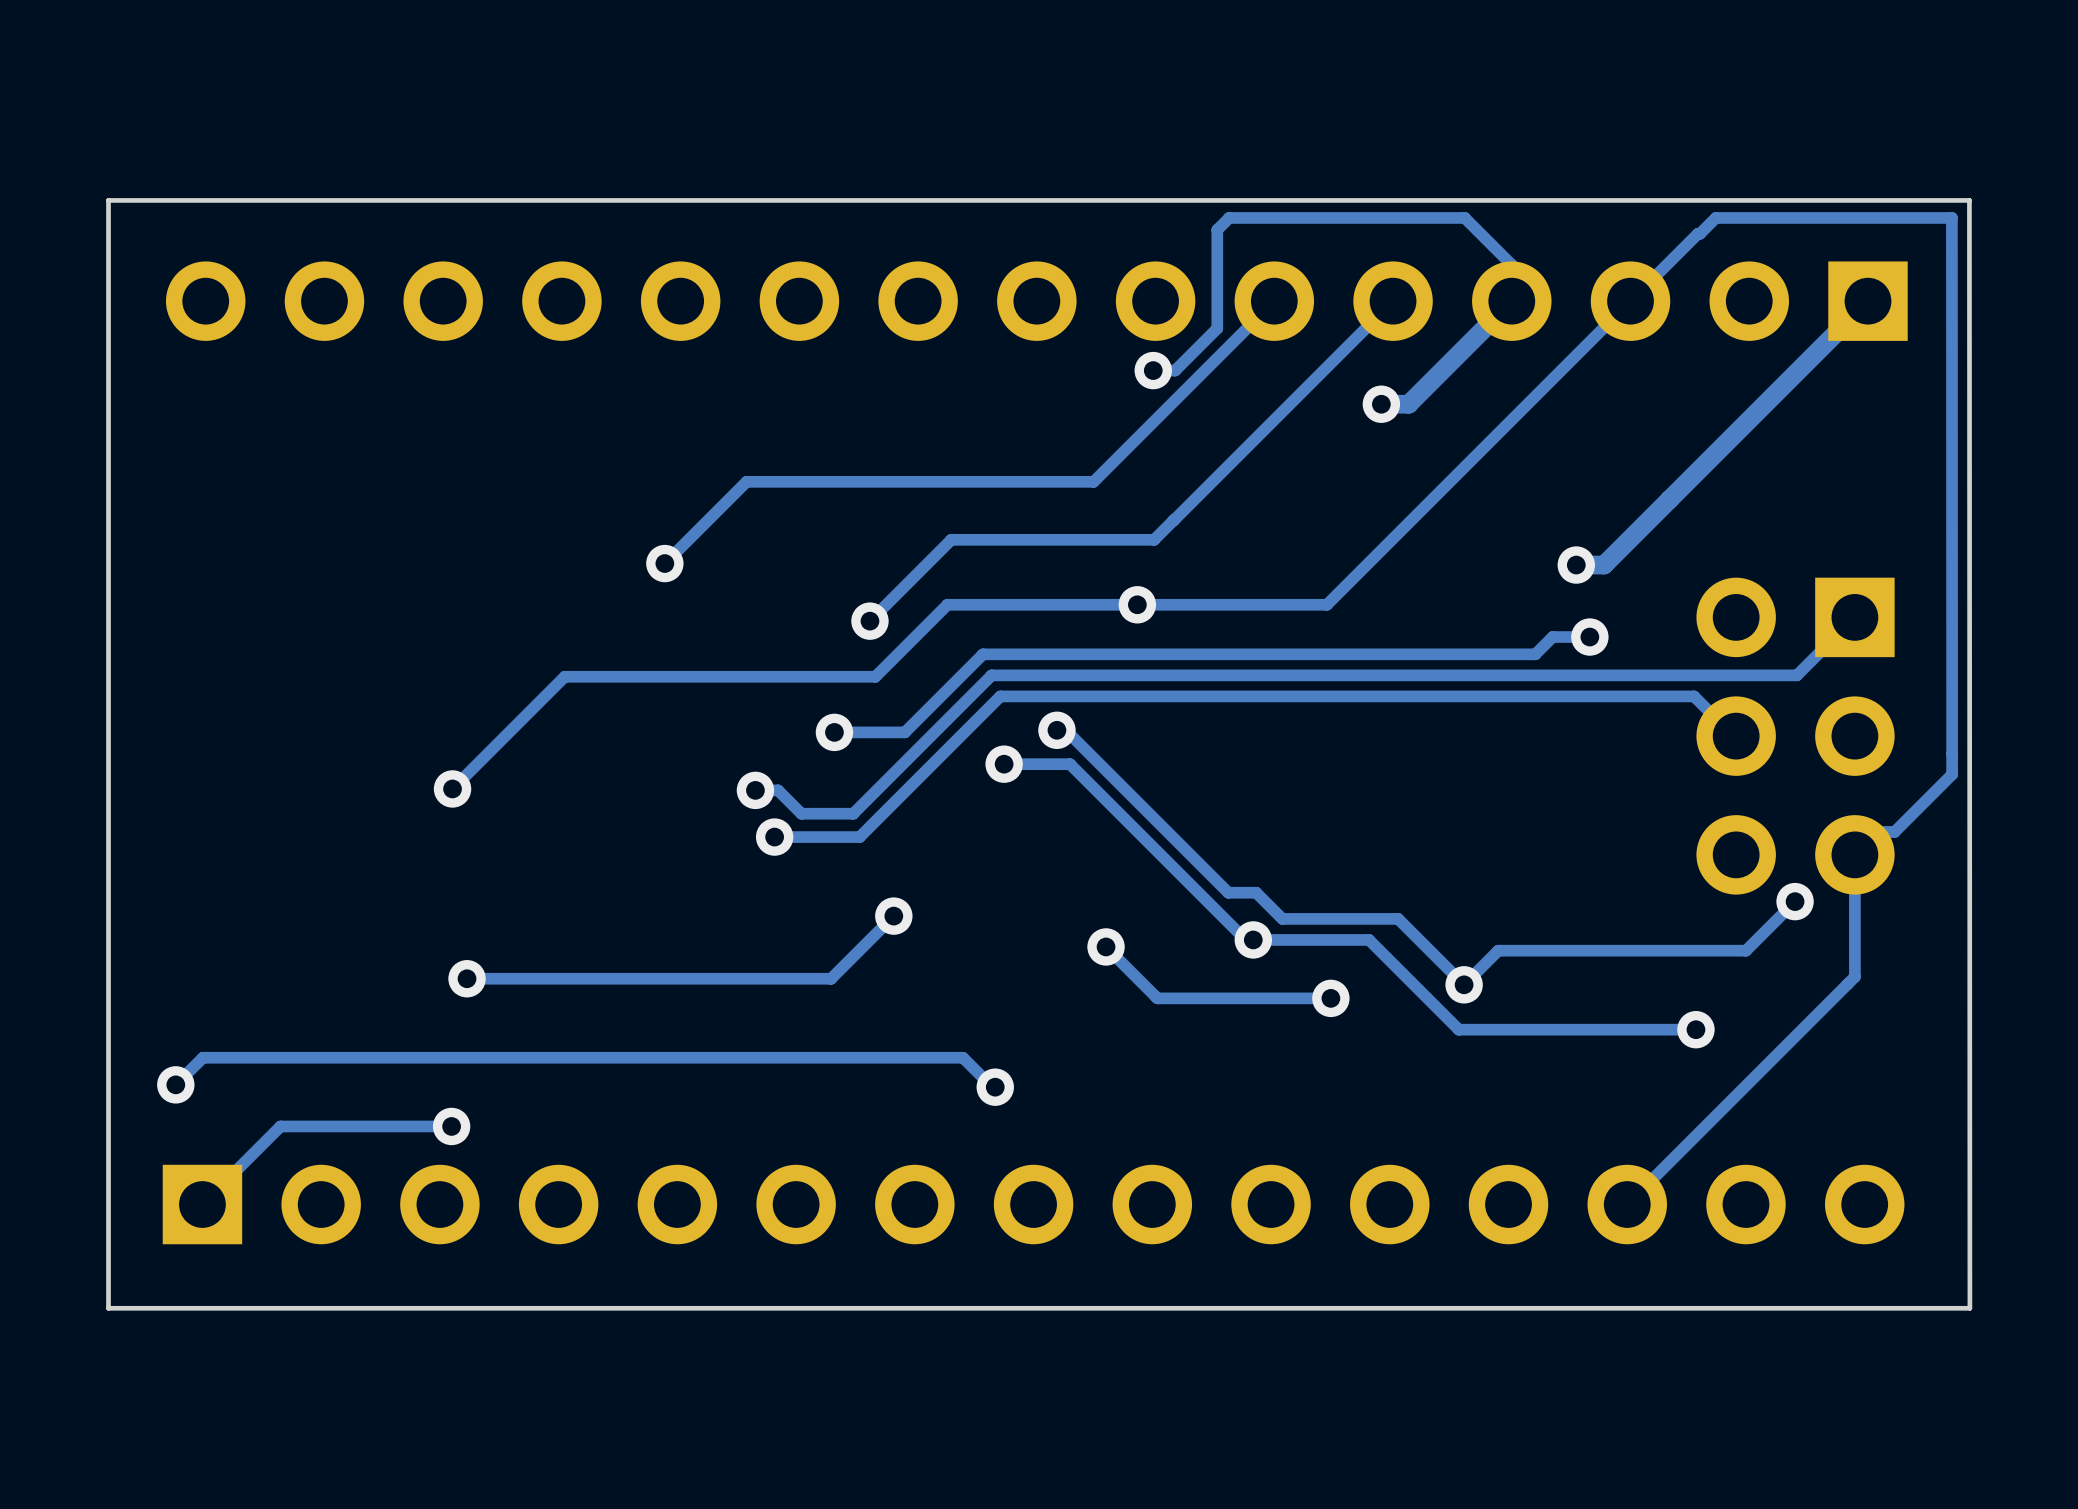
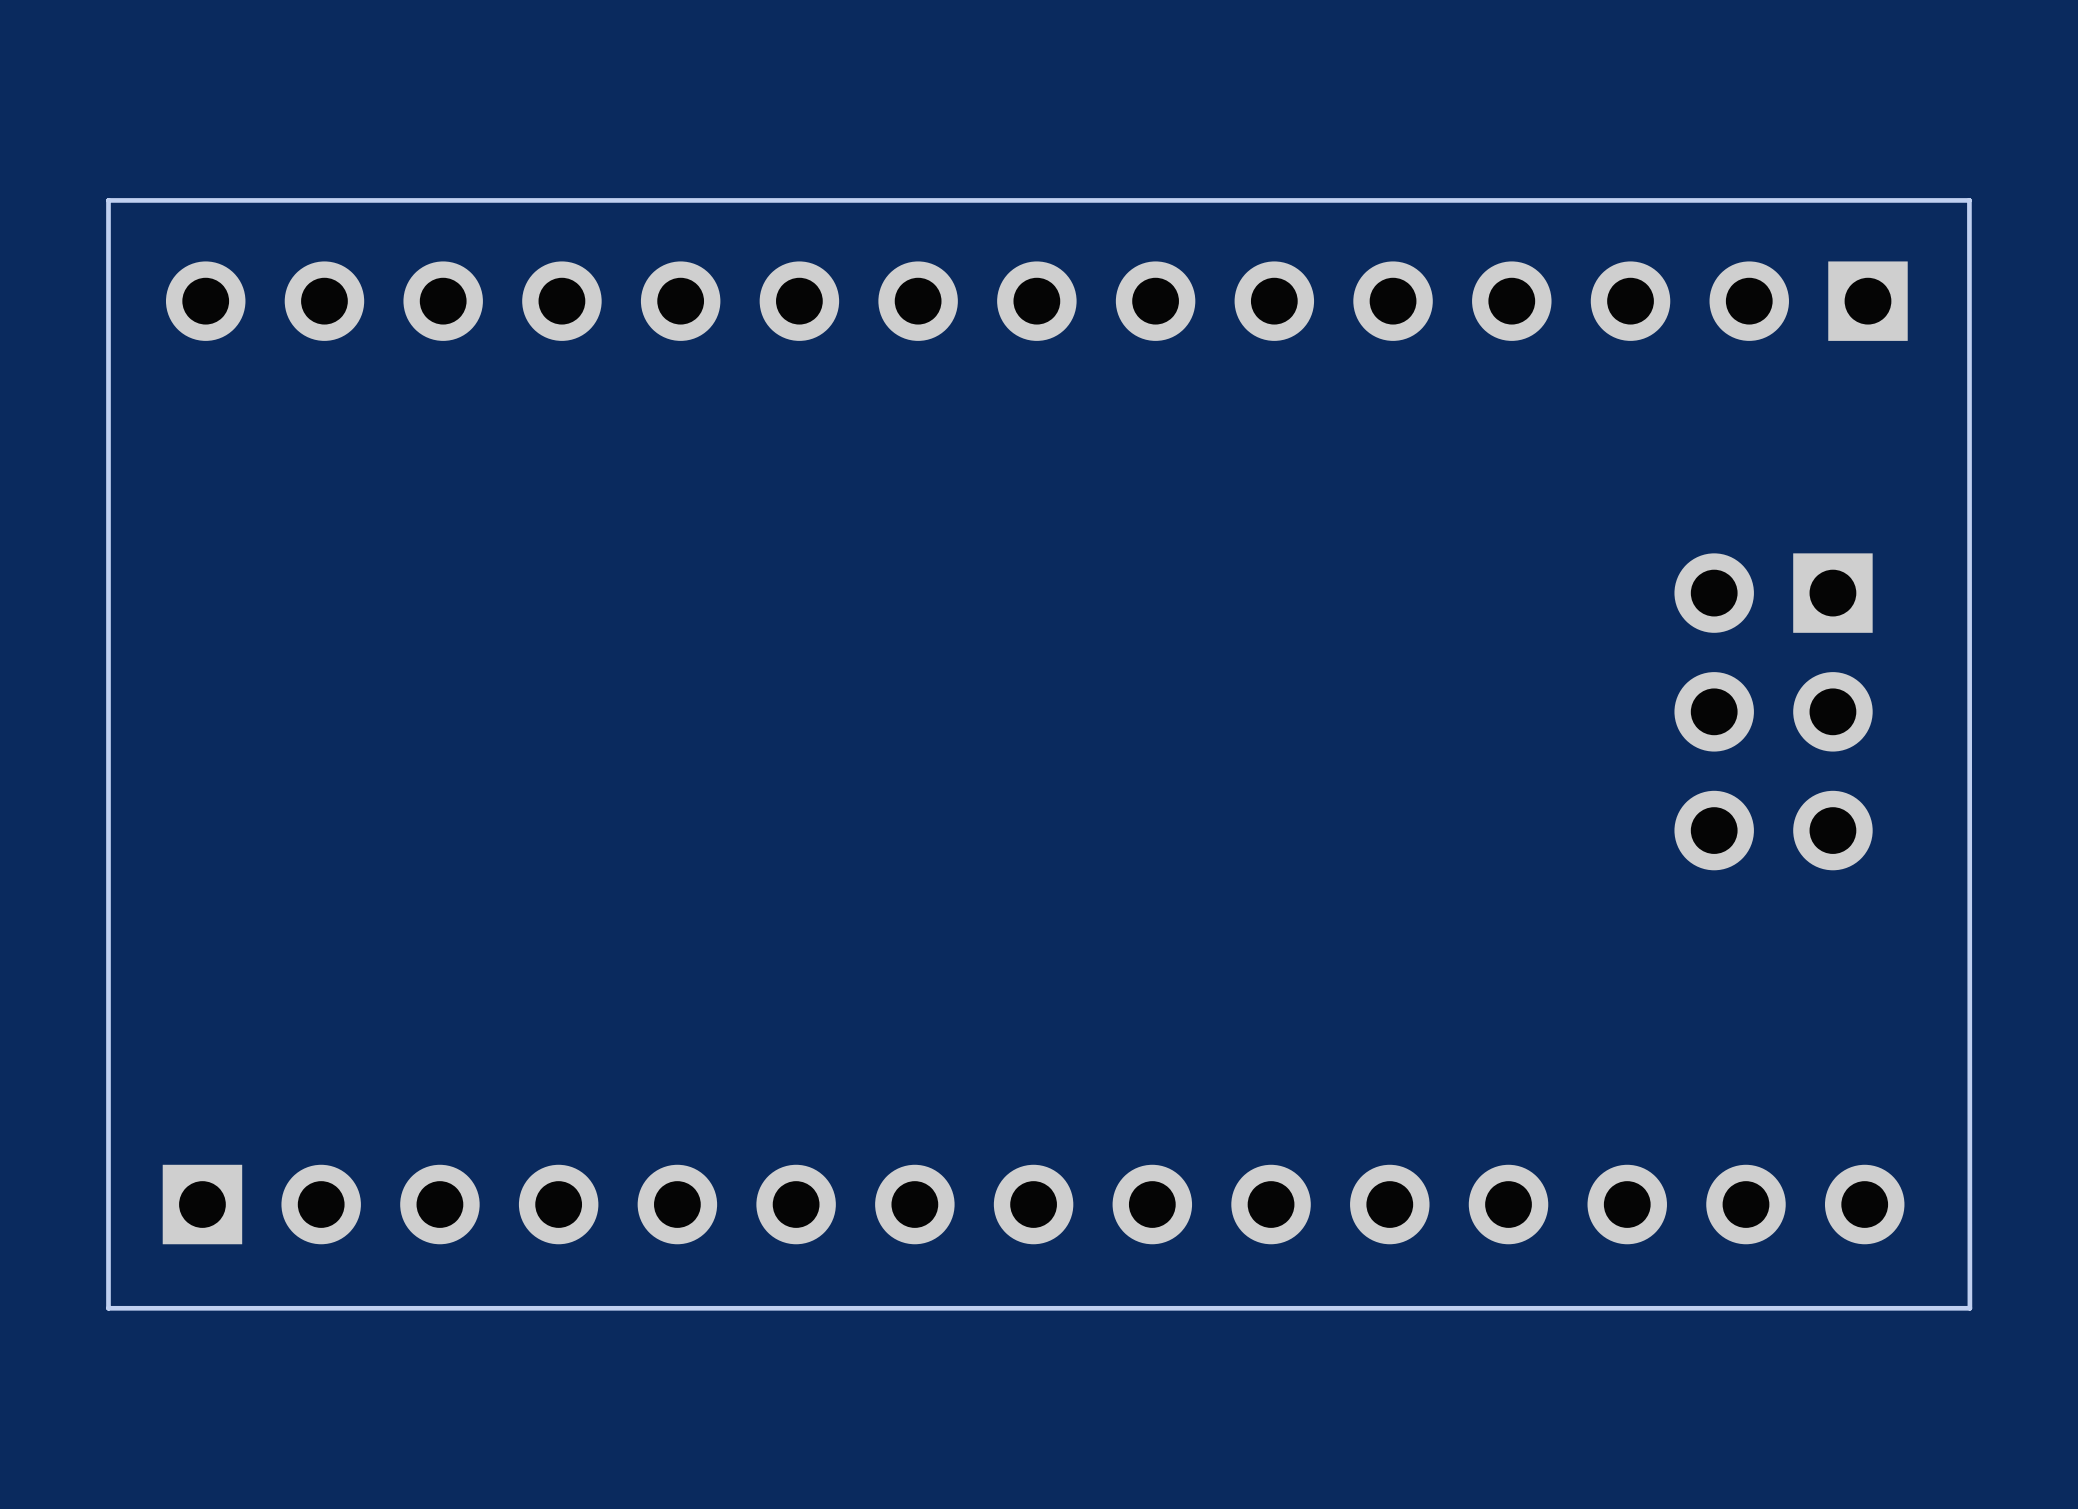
track: (1274, 301) (1093, 481) (746, 481) (664, 563) -> none
track: (1393, 301) (1174, 520) -> none
track: (1867, 301) (1604, 565) (1576, 565) -> none
track: (1153, 370) (1175, 370) (1217, 328) (1217, 229) (1229, 217) (1464, 217) (1511, 264) (1511, 301) (1408, 404) (1381, 404) -> none
via: (1153, 370) -> none
via: (1381, 404) -> none
track: (1173, 520) (1154, 539) (951, 539) (869, 621) -> none
via: (664, 563) -> none
via: (1576, 565) -> none
via: (1137, 604) -> none
track: (1854, 617) (1796, 675) (991, 675) (853, 813) (801, 813) (778, 790) (755, 790) -> none
via: (869, 621) -> none
track: (1589, 637) (1552, 637) (1535, 654) (982, 654) (904, 732) (834, 732) -> none
via: (1589, 637) -> none
track: (1729, 713) (1710, 713) (1694, 696) (1000, 696) (859, 837) (774, 837) -> none
track: (1056, 730) (1065, 730) (1228, 892) (1256, 892) (1282, 918) (1398, 918) (1464, 984) (1498, 950) (1745, 950) (1795, 901) -> none
via: (1056, 730) -> none
via: (834, 732) -> none
part position: (1795, 736) -> (1773, 711)
track: (1004, 764) (1070, 764) (1245, 939) (1369, 939) (1458, 1029) (1695, 1029) -> none
via: (1004, 764) -> none
track: (452, 788) (564, 676) (875, 676) (947, 604) (1326, 604) (1715, 217) (1951, 217) (1952, 774) (1894, 831) (1847, 831) -> none
via: (452, 788) -> none
via: (755, 790) -> none
via: (774, 837) -> none
track: (1854, 854) (1854, 976) (1627, 1204) -> none
via: (1795, 901) -> none
track: (893, 916) (831, 978) (467, 978) -> none
via: (893, 916) -> none
via: (1253, 939) -> none
track: (1106, 946) (1157, 998) (1330, 998) -> none
via: (1106, 946) -> none
via: (467, 978) -> none
via: (1464, 984) -> none
via: (1330, 998) -> none
via: (1695, 1029) -> none
via: (175, 1084) -> none
track: (995, 1087) (992, 1087) (963, 1057) (202, 1057) (175, 1084) (178, 1087) -> none
via: (995, 1087) -> none
track: (451, 1126) (280, 1126) (202, 1204) -> none
via: (451, 1126) -> none

